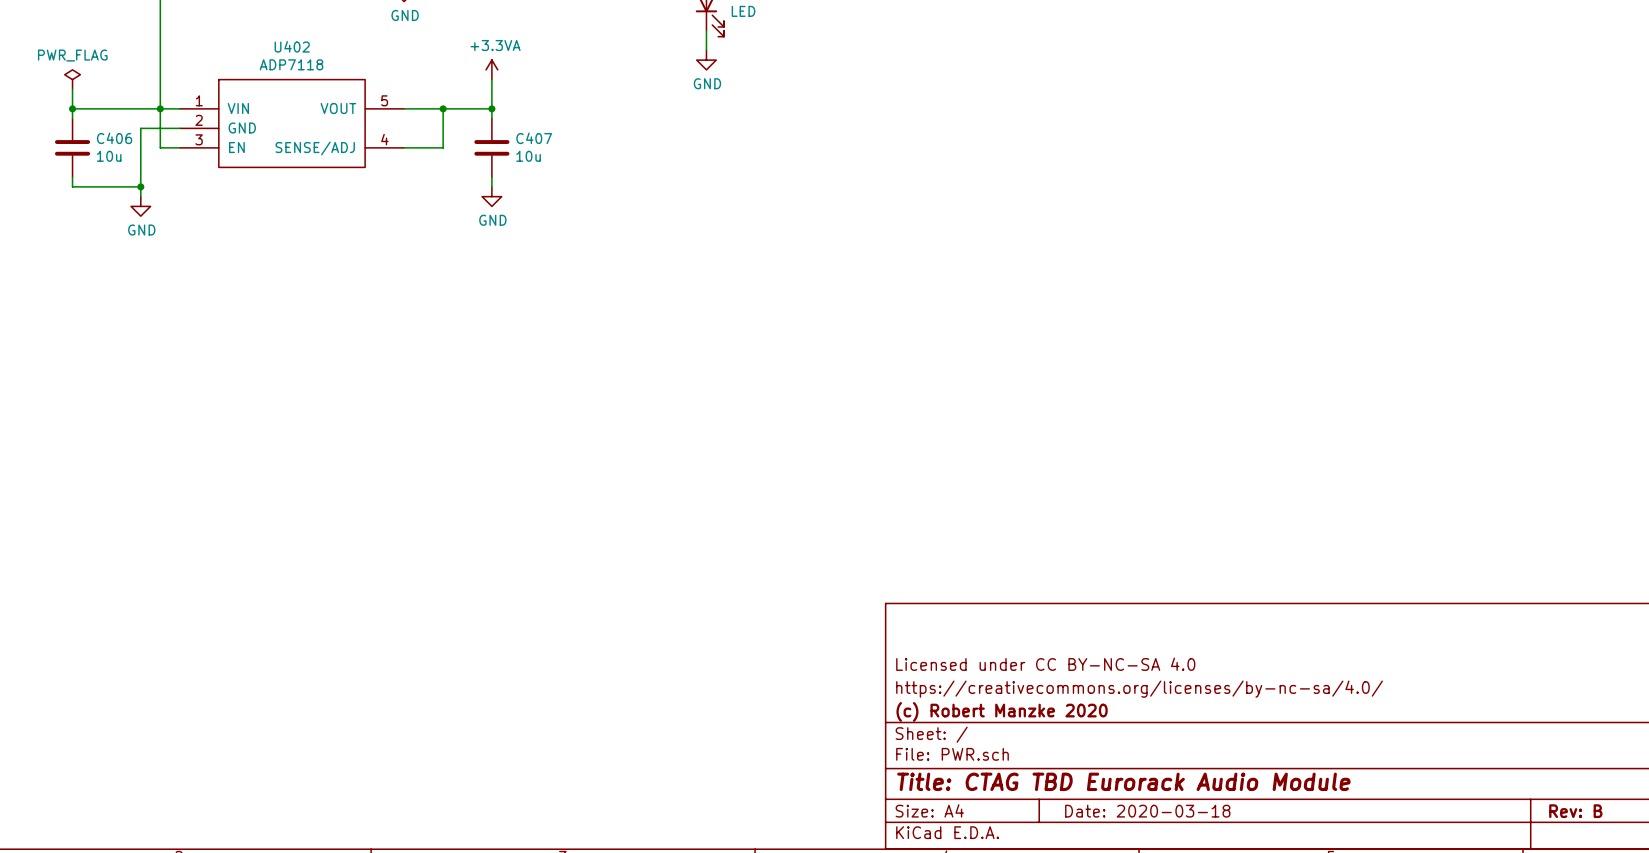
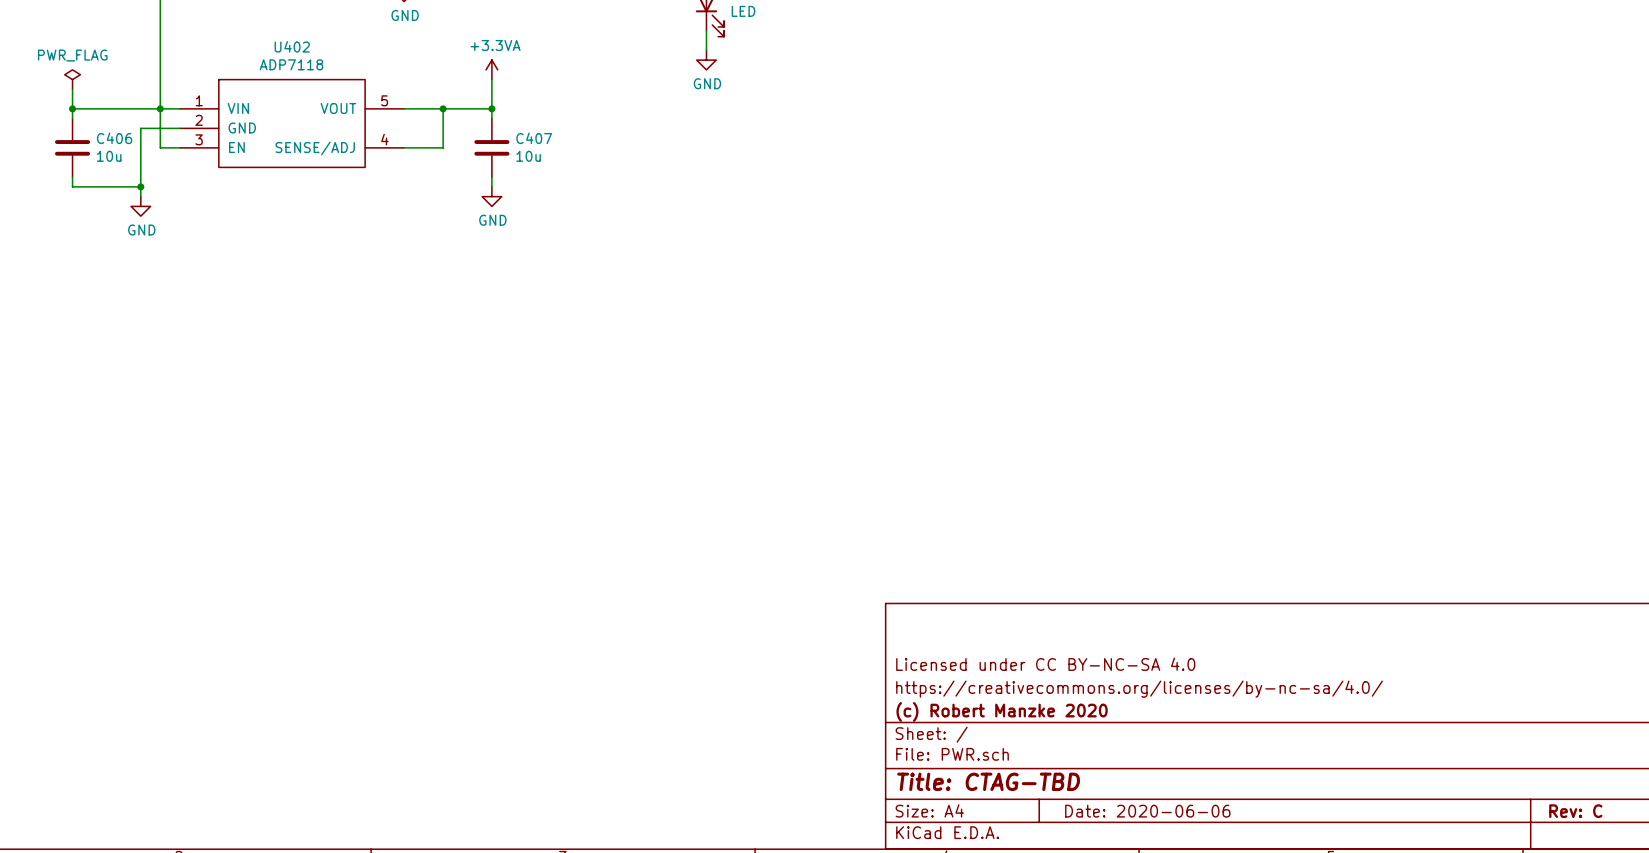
title block: Title: CTAG TBD Eurorack Audio Module (1123, 781) -> Title: CTAG-TBD (988, 781)
title block: Date: 2020-03-18 (1147, 811) -> Date: 2020-06-06 (1147, 811)
title block: Rev: B (1575, 811) -> Rev: C (1575, 811)

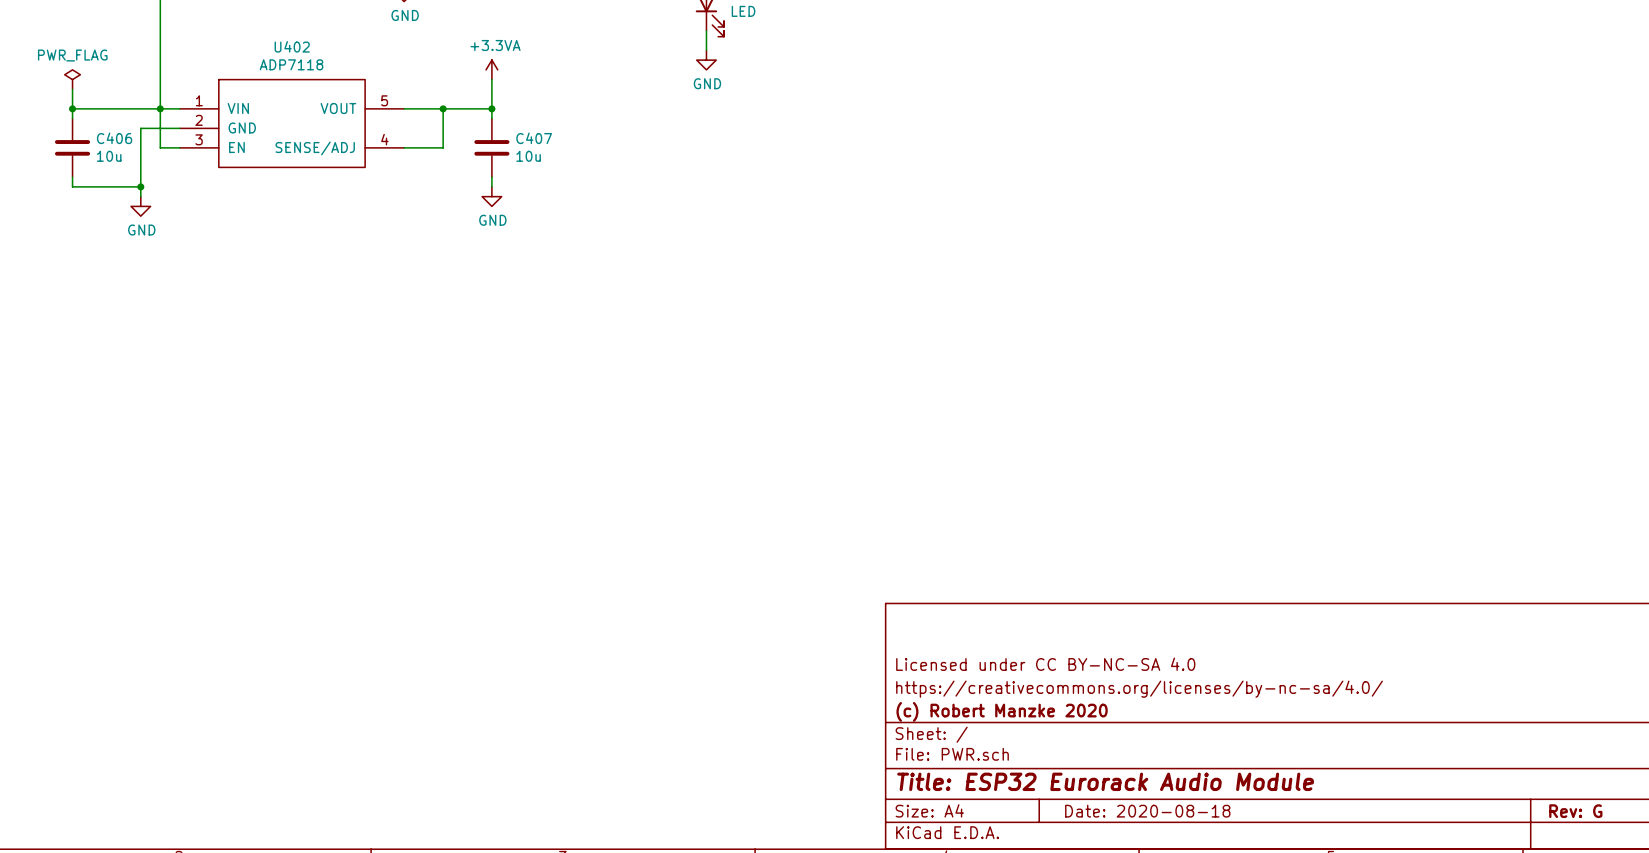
title block: Title: CTAG-TBD (988, 781) -> Title: ESP32 Eurorack Audio Module (1105, 781)
title block: Date: 2020-06-06 (1147, 811) -> Date: 2020-08-18 (1147, 811)
title block: Rev: C (1575, 811) -> Rev: G (1575, 811)

